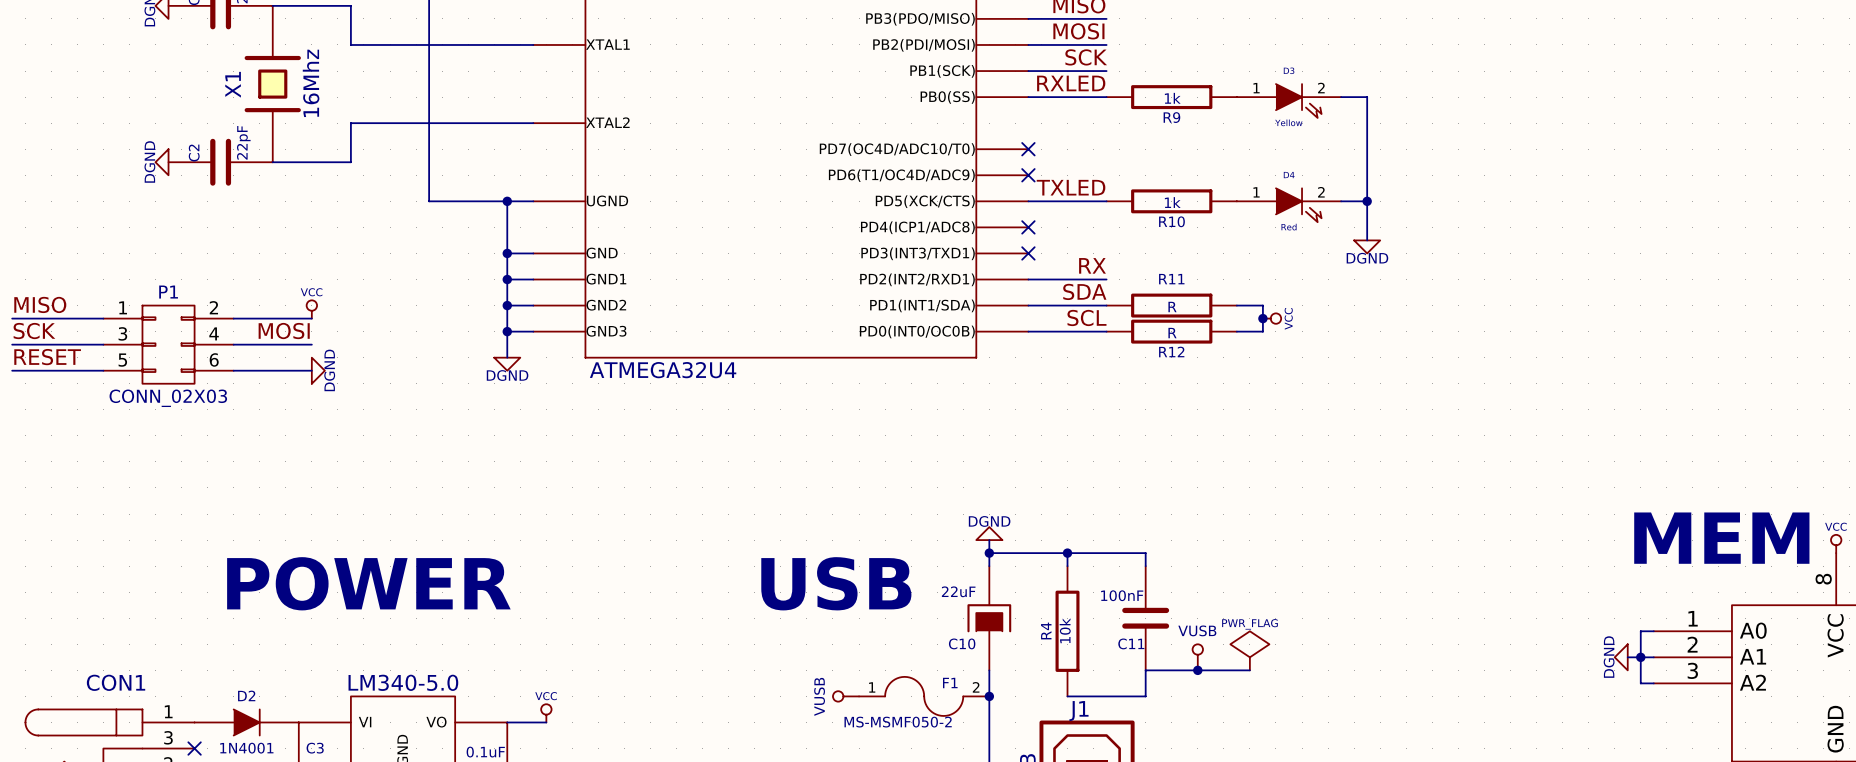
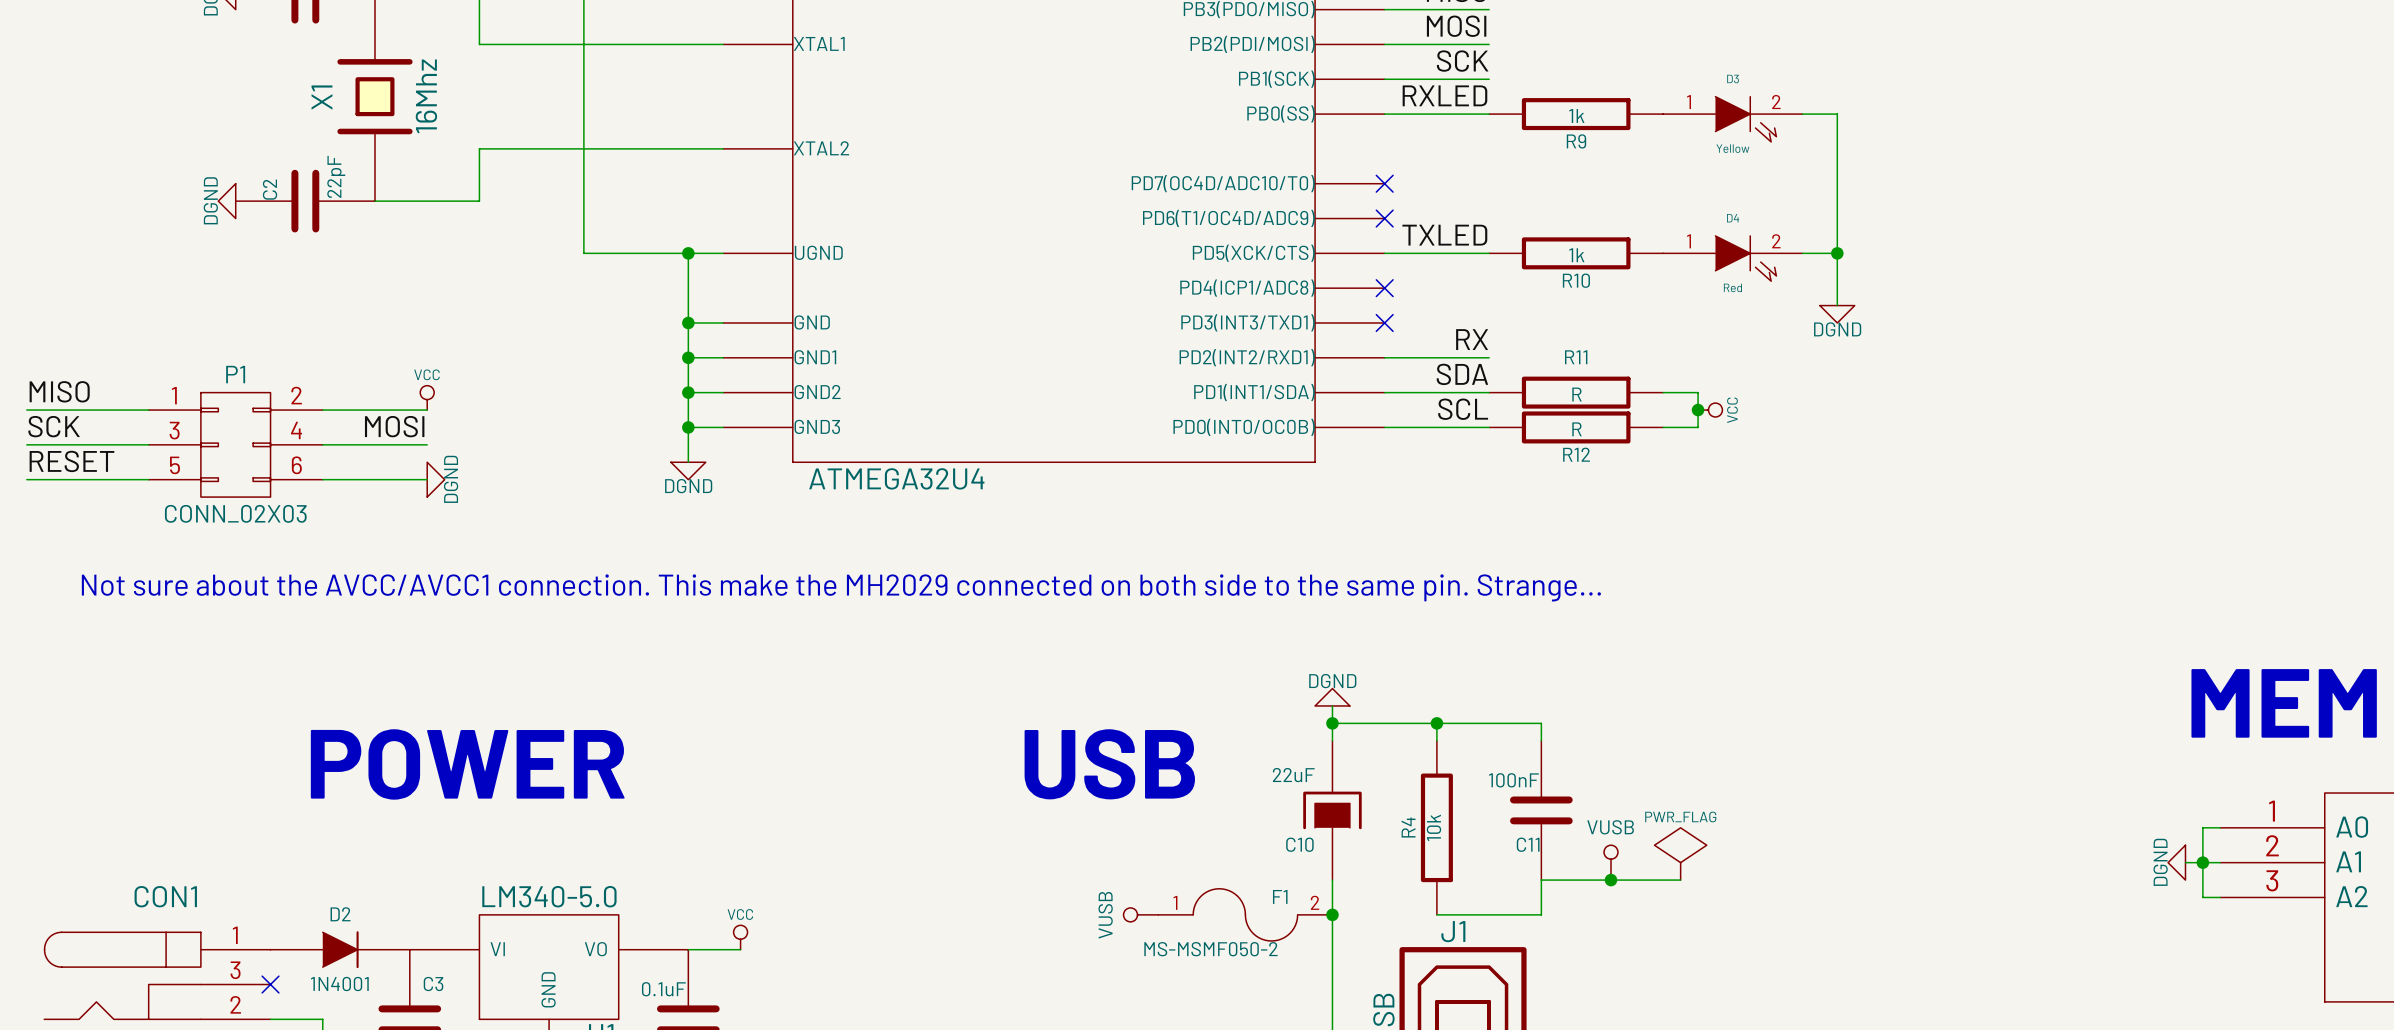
text: none -> Not sure about the AVCC/AVCC1 connection. This make the MH2029 connected on both side to the same pin. Strange... (841, 587)

